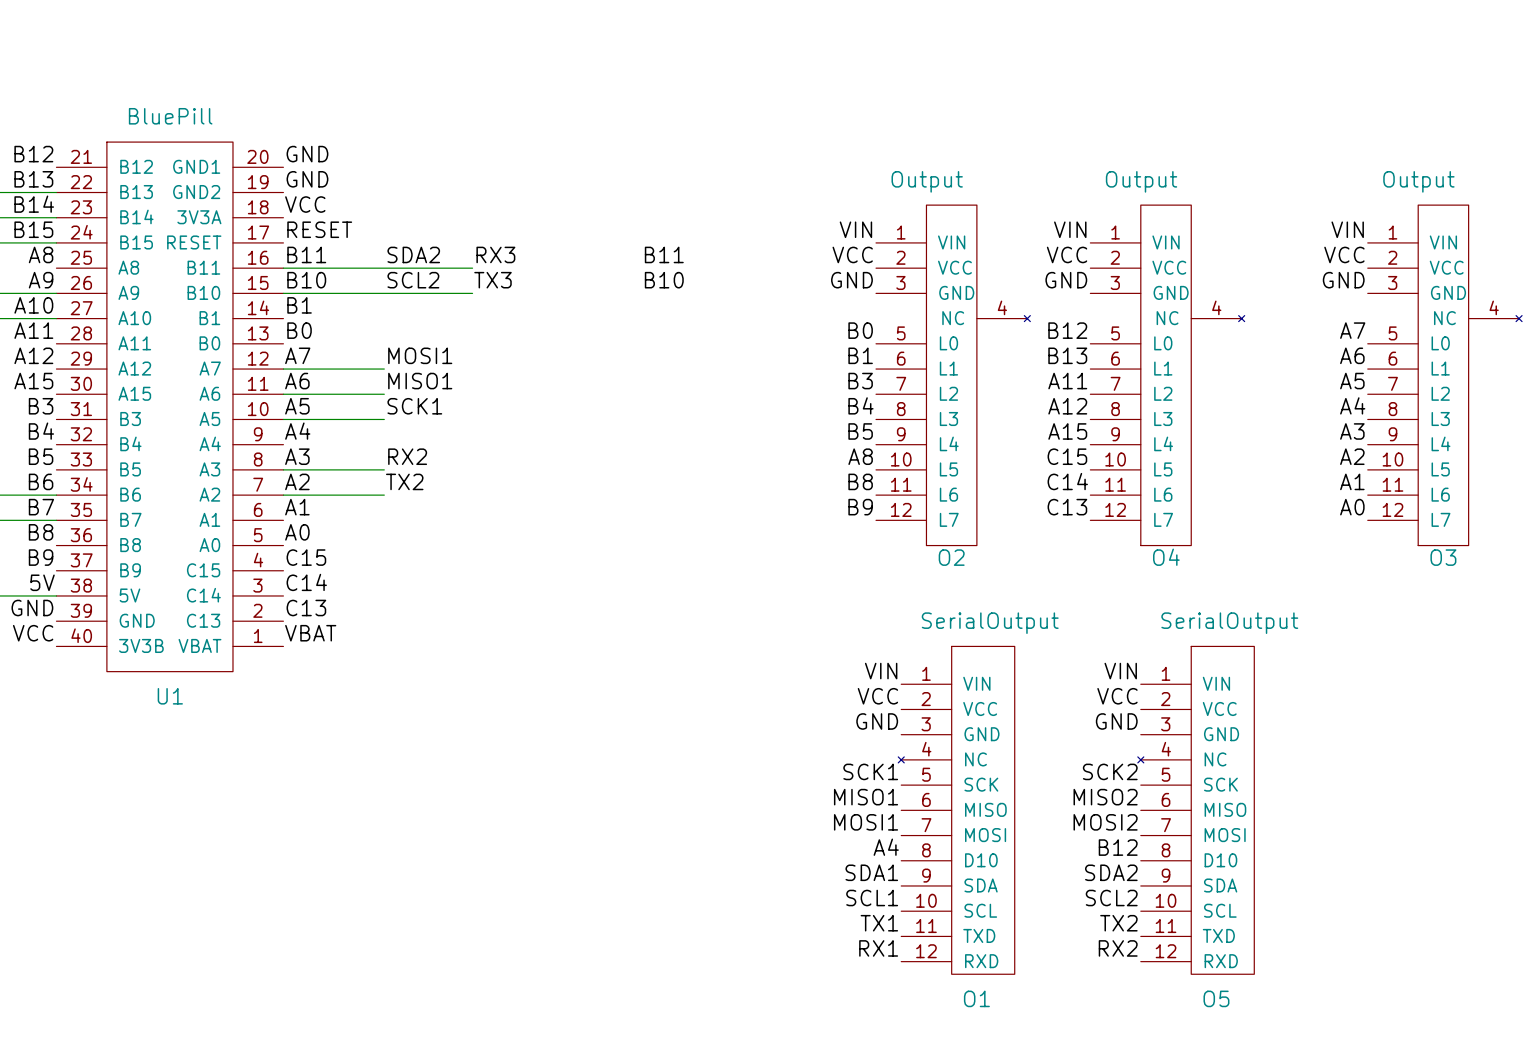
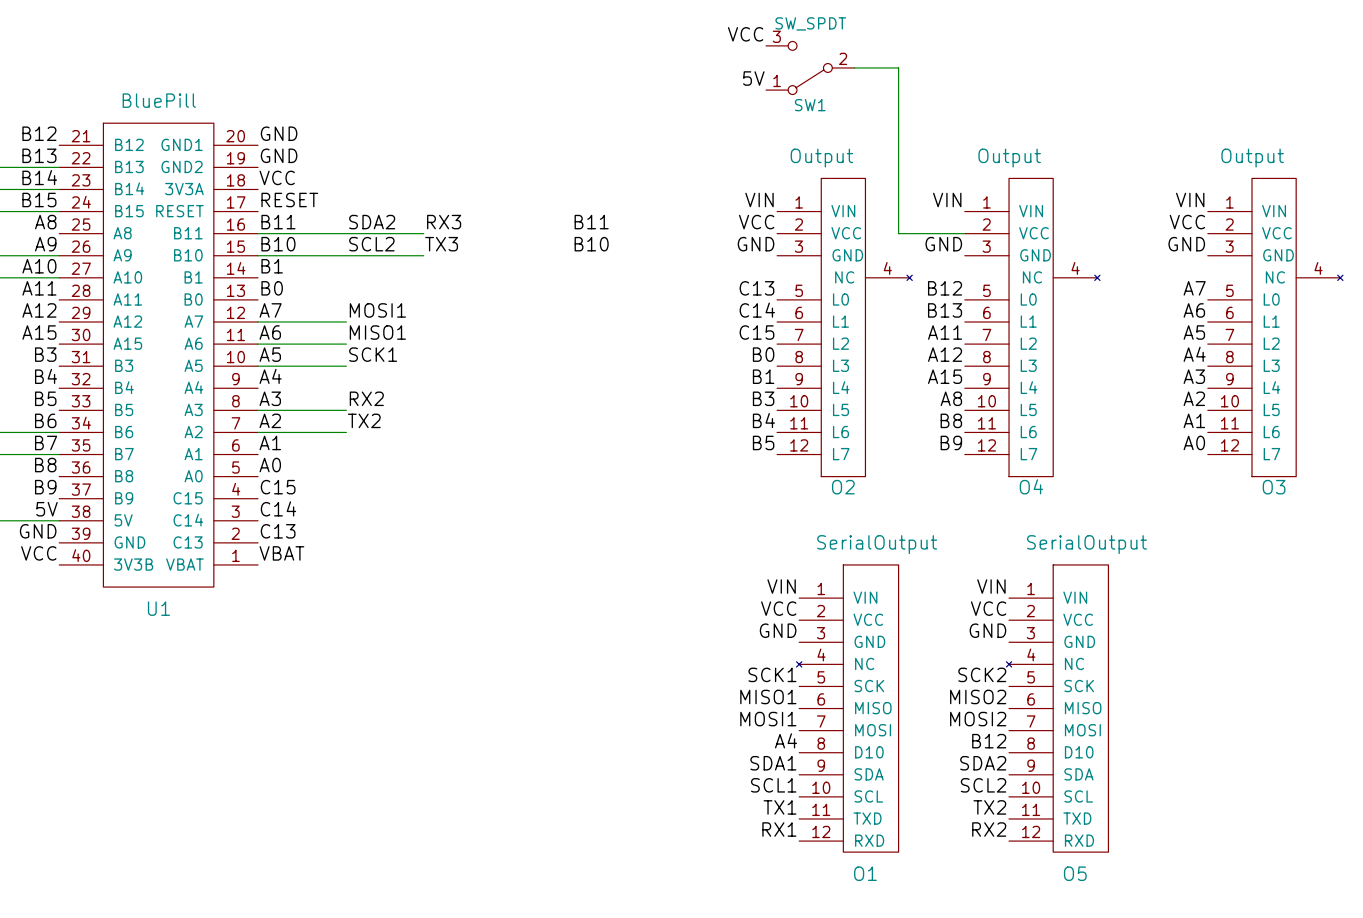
label: none -> VCC (745, 34)
SW1: none -> SW_SPDT (810, 67)
wire: none -> (854, 67) (898, 67) (898, 233) (964, 233)
label: none -> 5V (753, 78)
label: VCC (1067, 254) -> none
label: B0 (860, 330) -> C13 (756, 288)
label: B1 (860, 355) -> C14 (757, 310)
label: B3 (860, 381) -> C15 (756, 332)
label: B4 (860, 405) -> B0 (763, 354)
label: B5 (860, 431) -> B1 (763, 376)
label: A8 (860, 456) -> B3 (763, 398)
label: C15 (1067, 456) -> A8 (951, 398)
label: B8 (860, 481) -> B4 (763, 420)
label: C14 (1067, 481) -> B8 (951, 420)
label: B9 (860, 507) -> B5 (763, 442)
label: C13 (1067, 507) -> B9 (951, 442)

